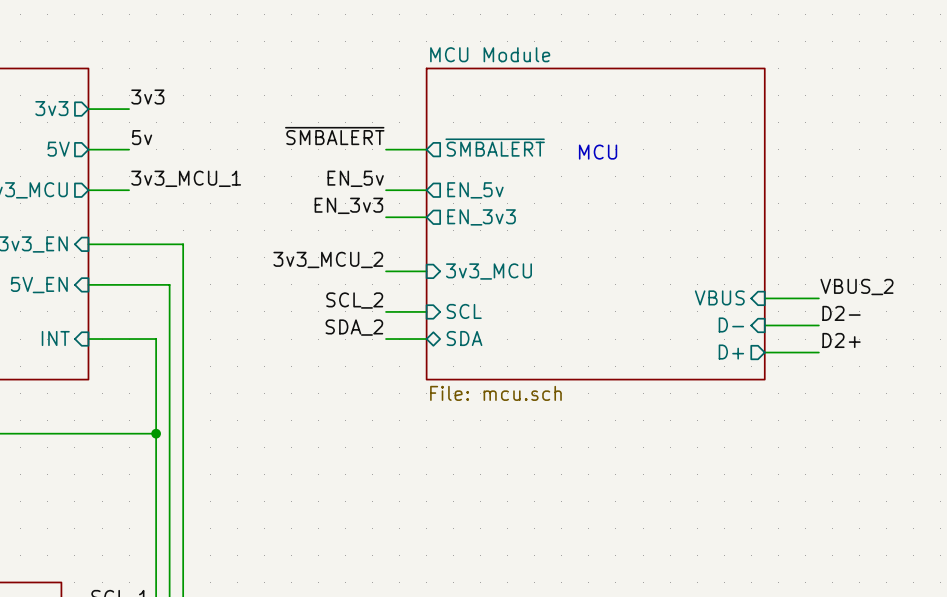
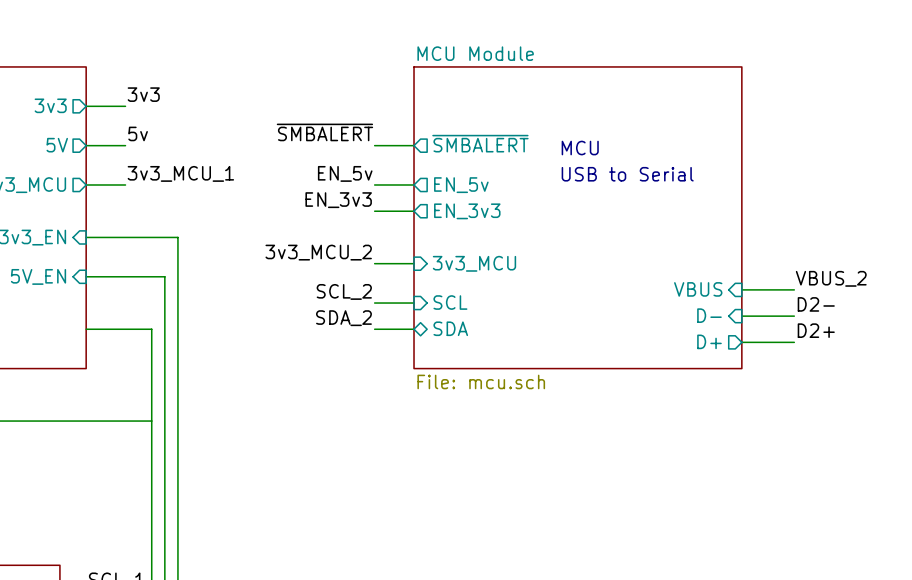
text: none -> USB to Serial (627, 174)
sheet pin: INT (55, 338) -> none
junction: (156, 433) -> none

